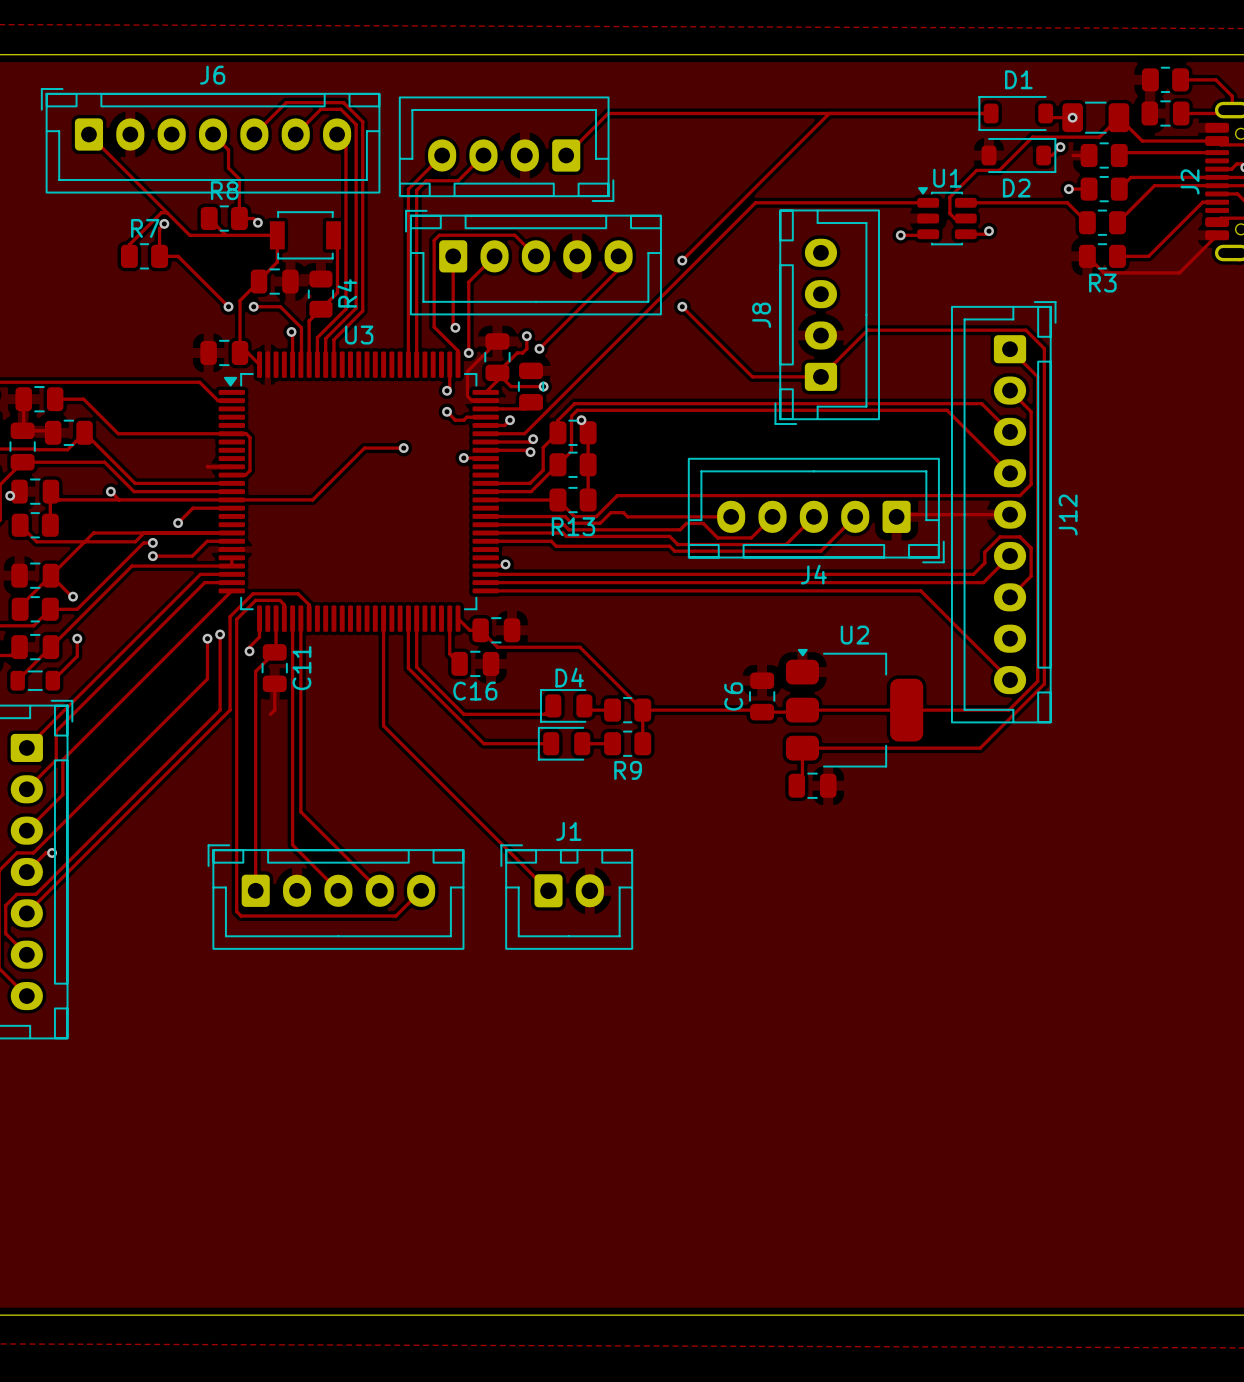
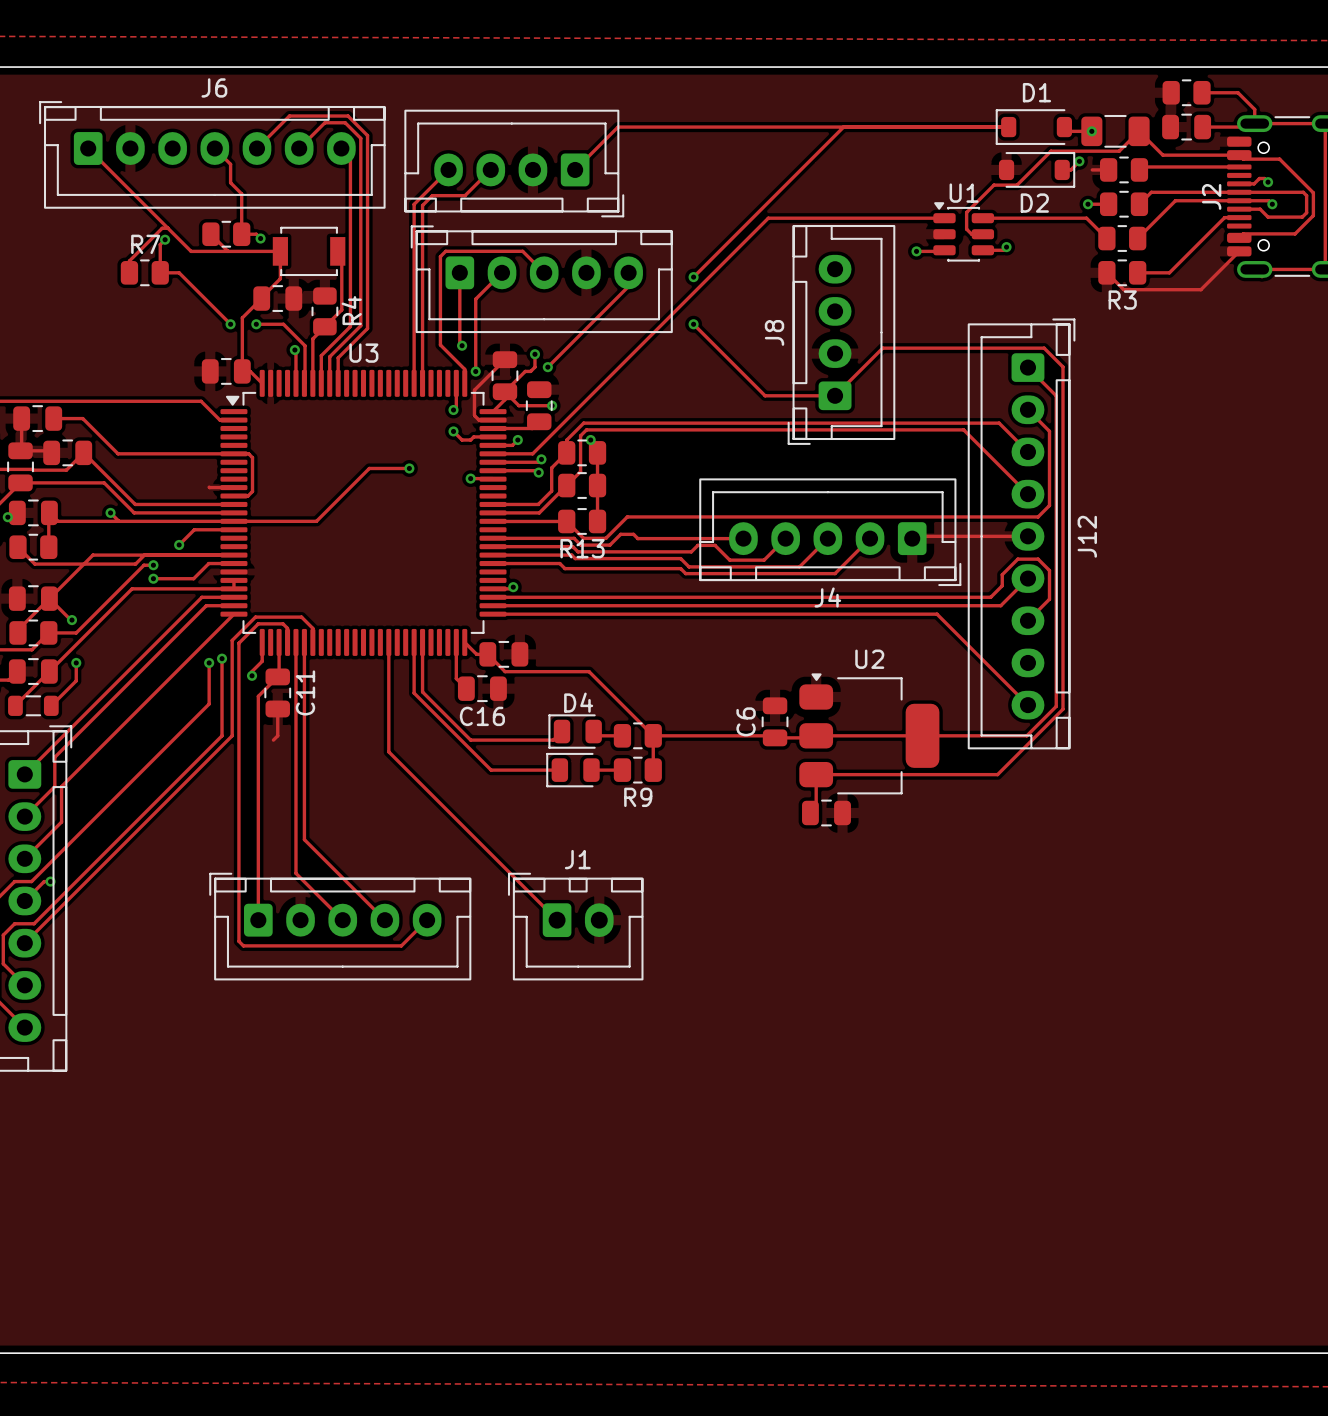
R8 name: R8 (224, 190) -> none

